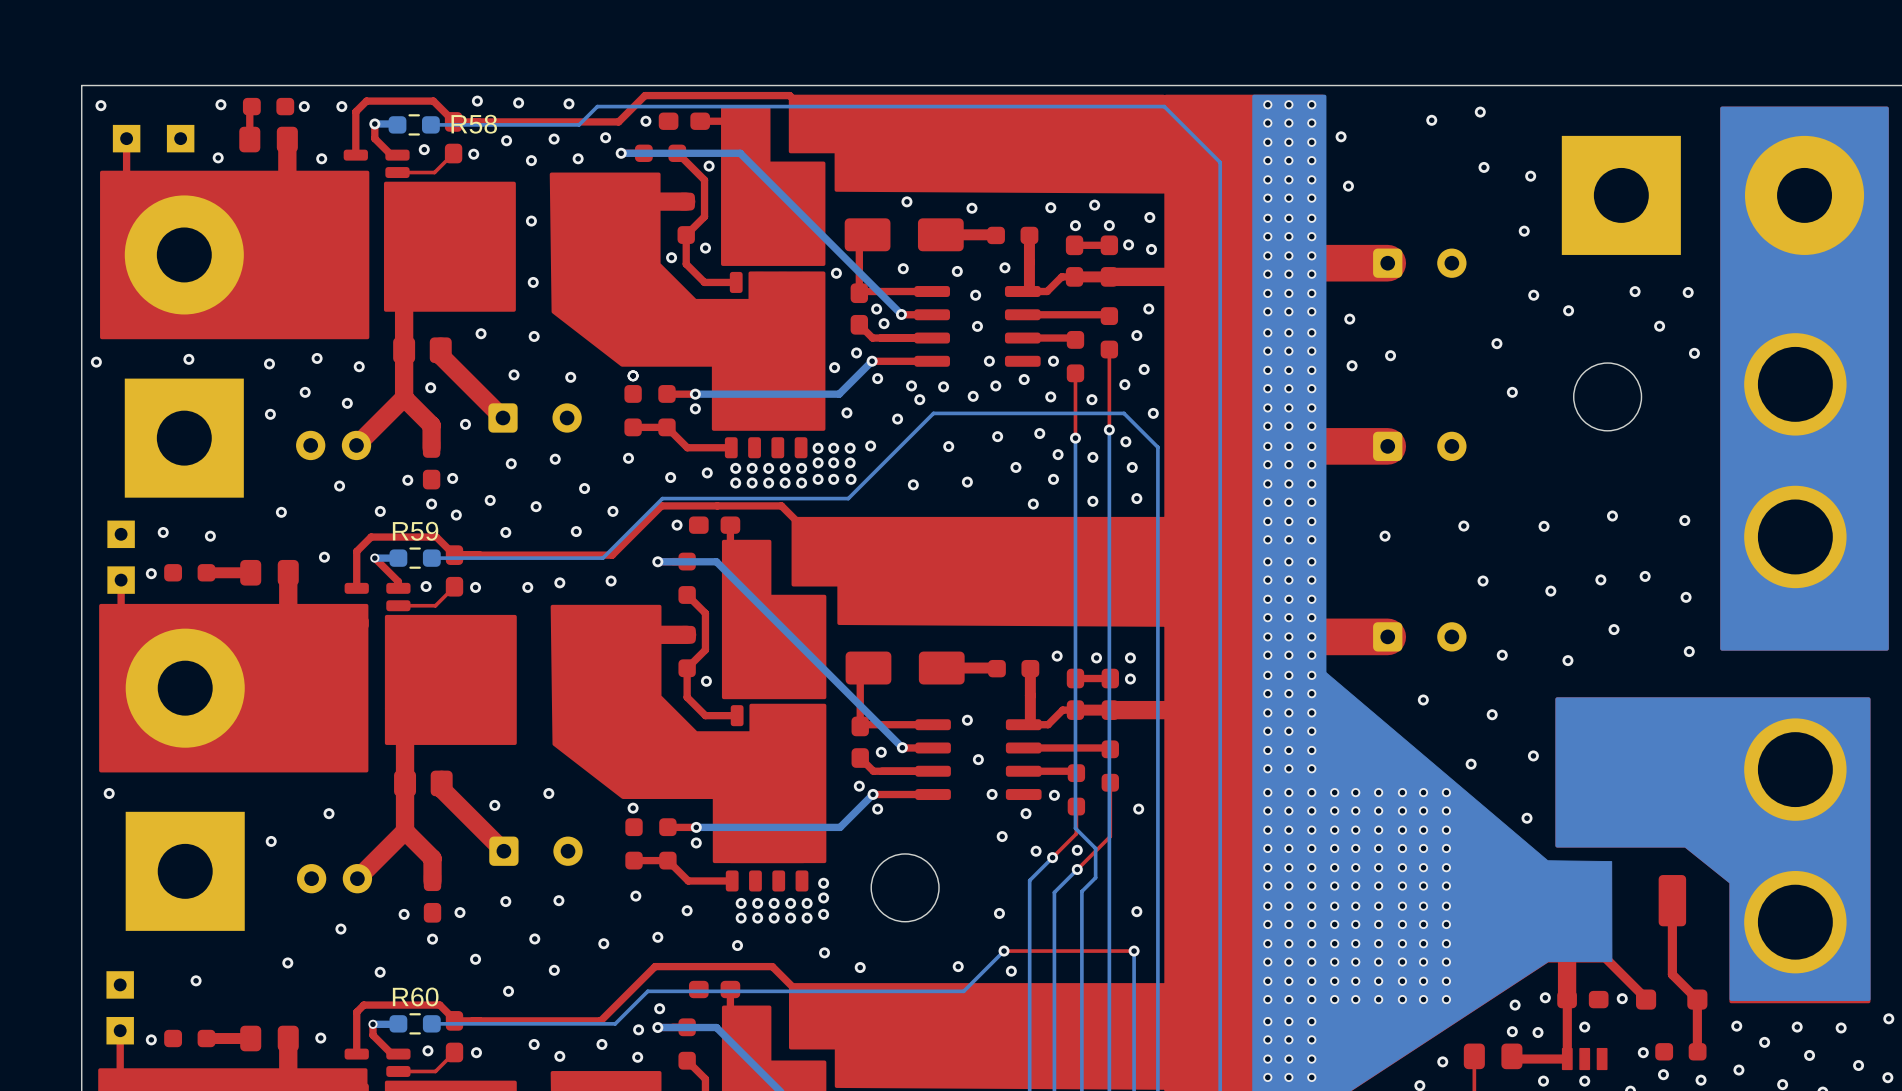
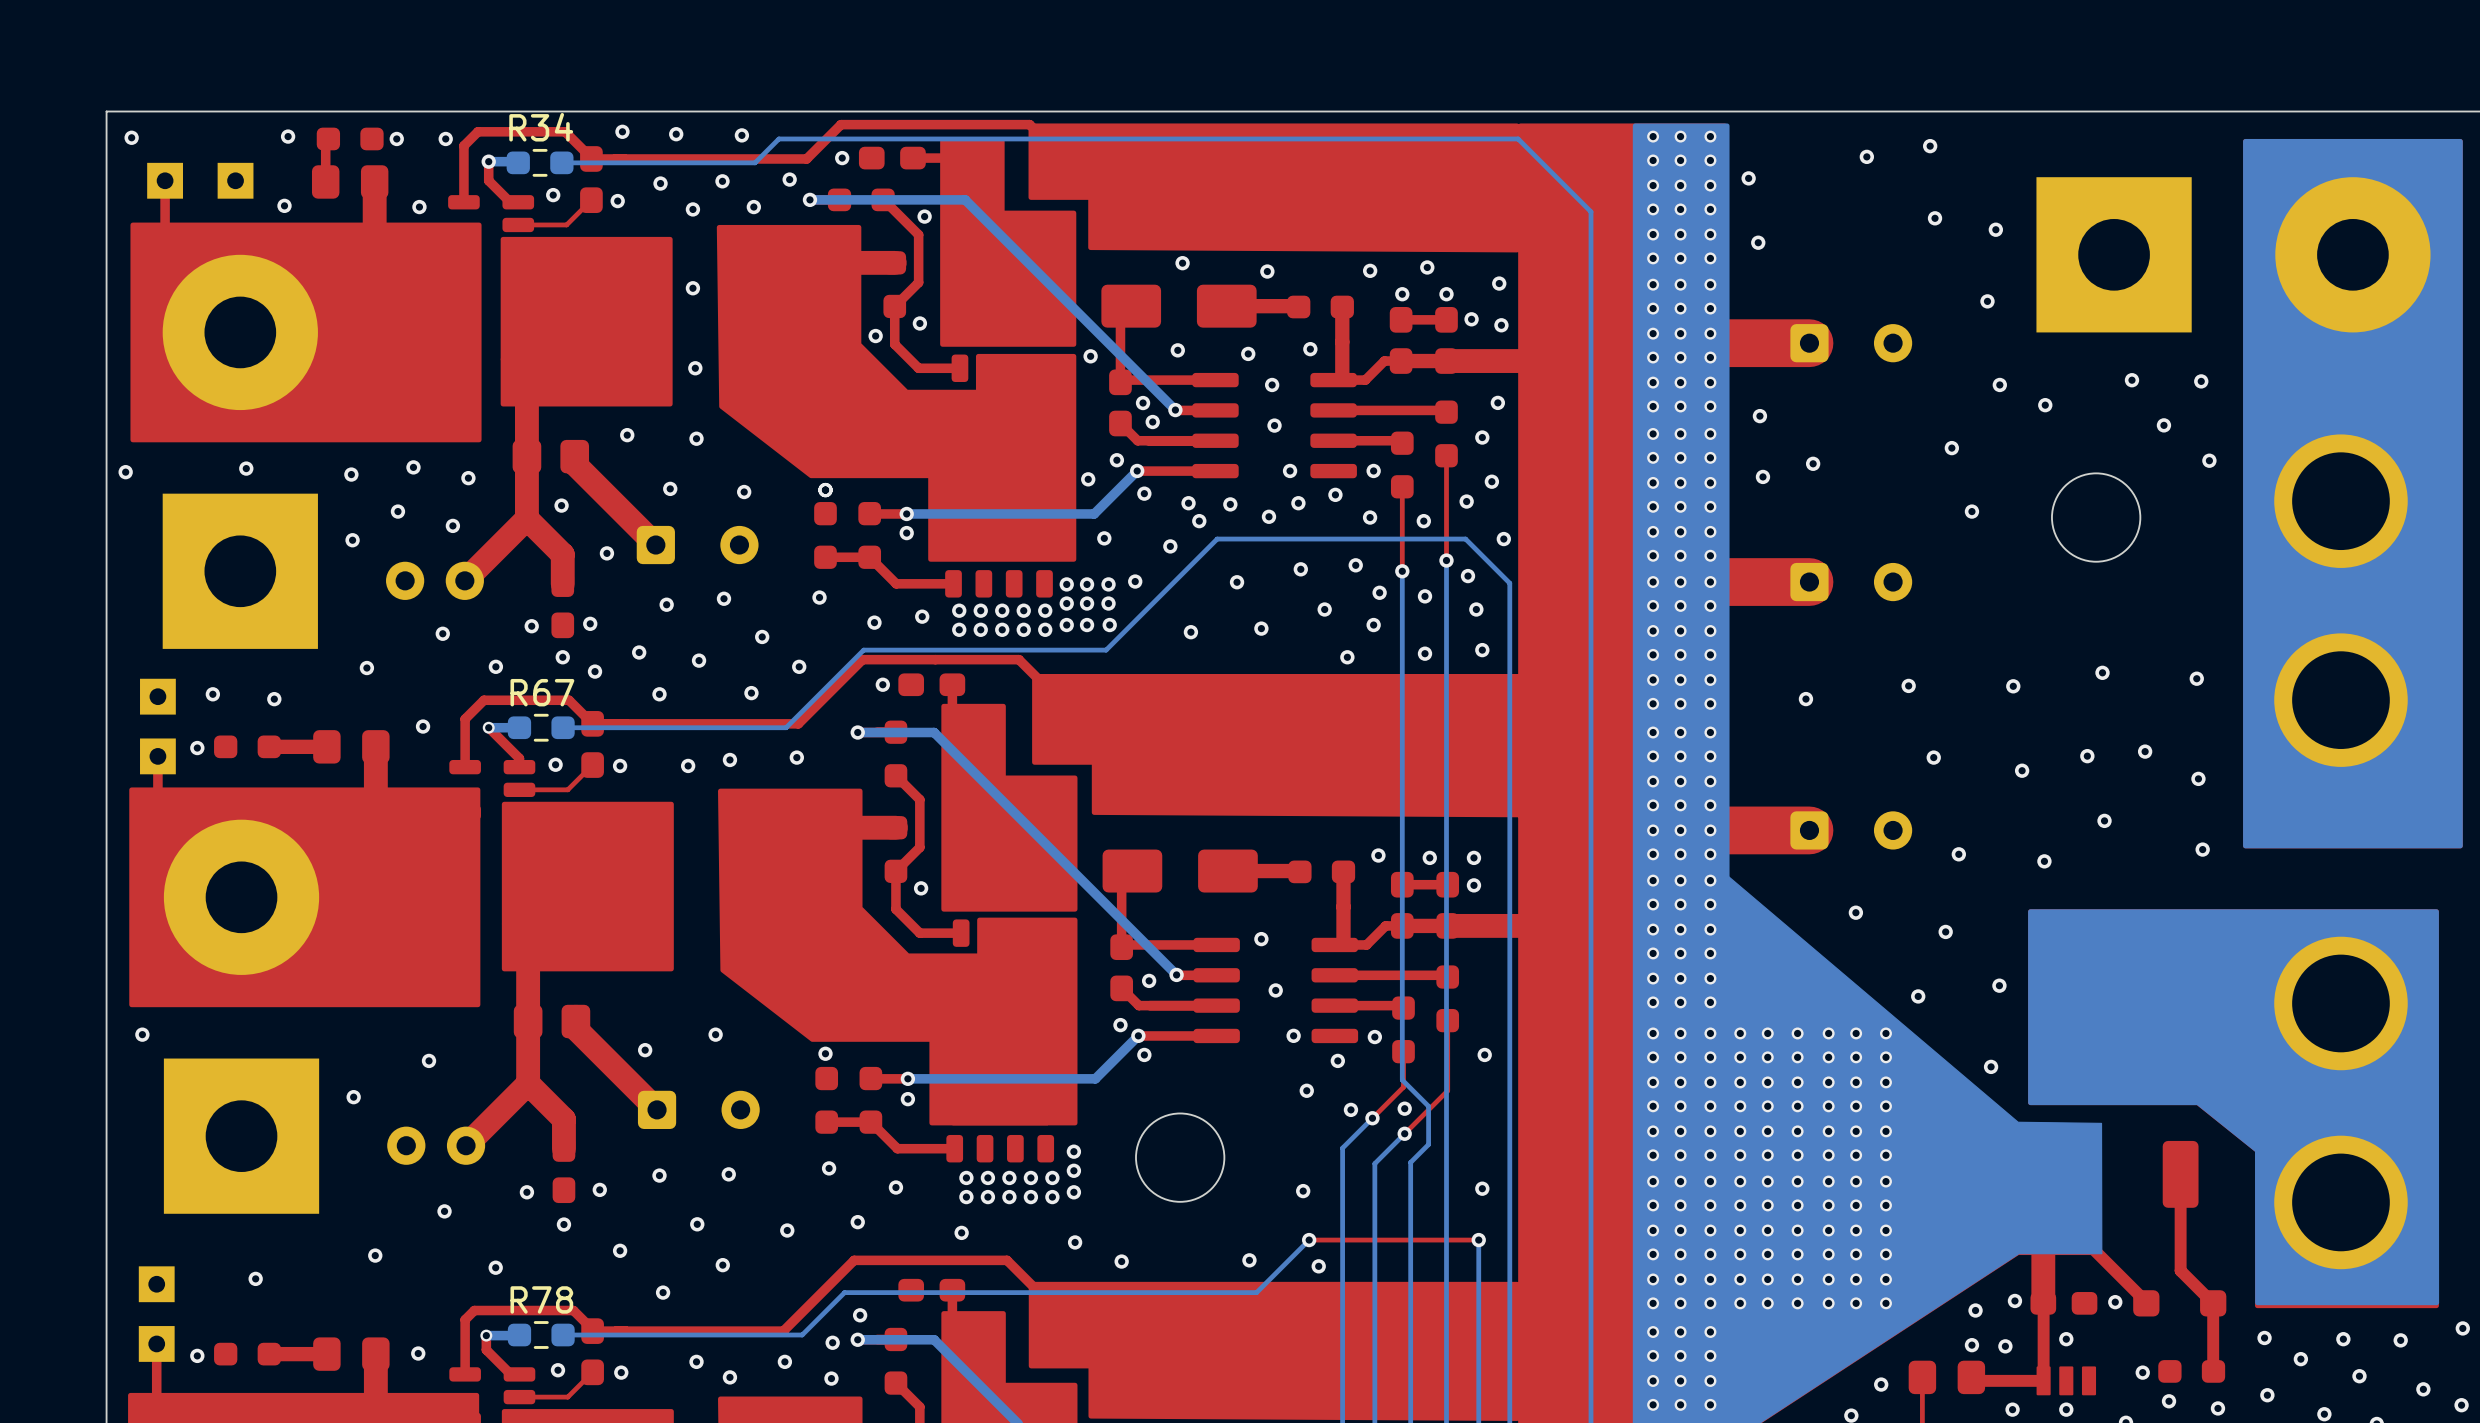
R58 name: R58 (474, 124) -> R34 (541, 127)
R59 name: R59 (415, 531) -> R67 (542, 692)
R60 name: R60 (415, 996) -> R78 (541, 1299)

